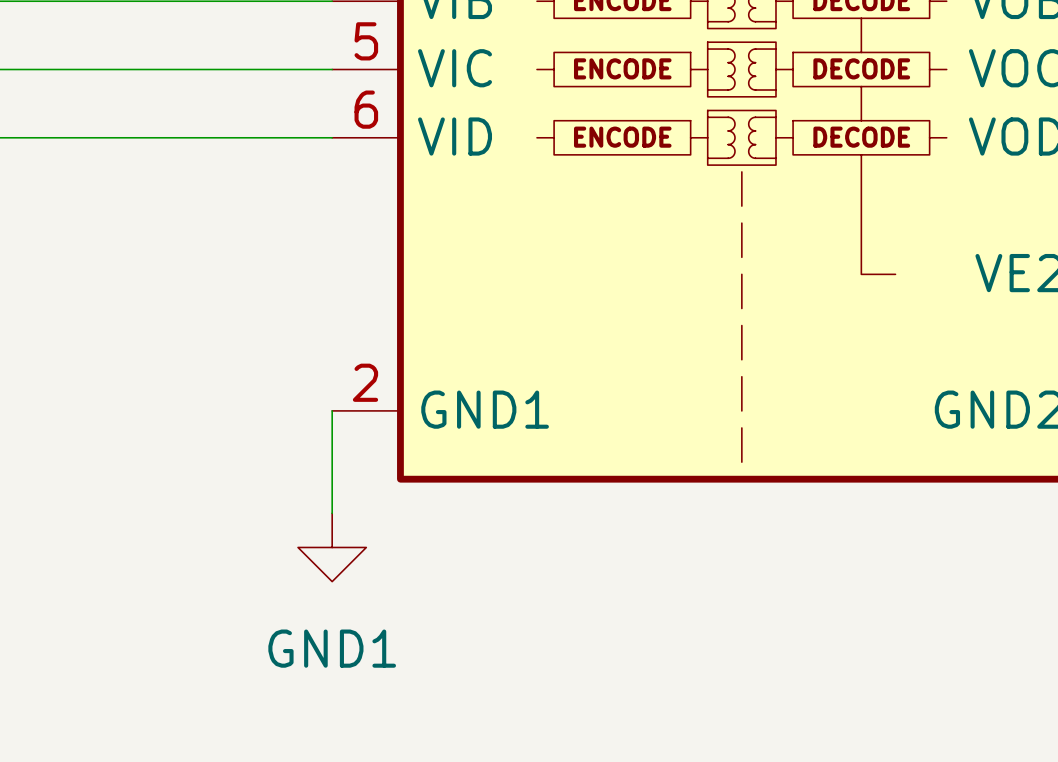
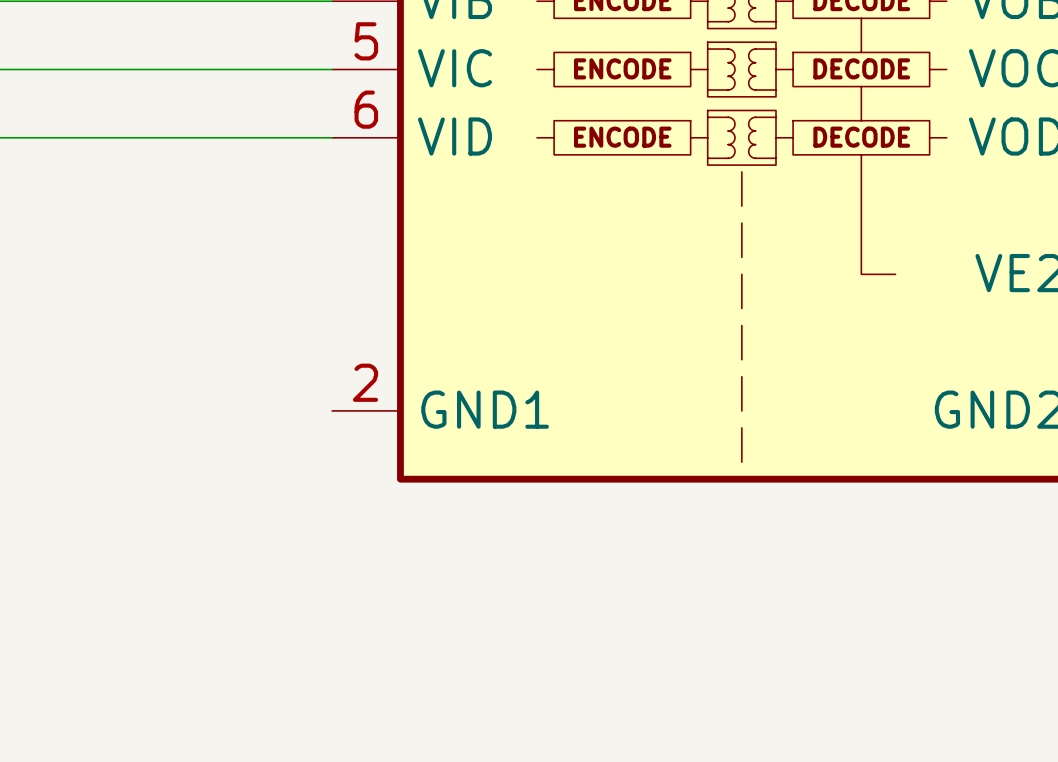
wire: (332, 410) (332, 513) -> none
power symbol: GND1 (332, 547) -> none

